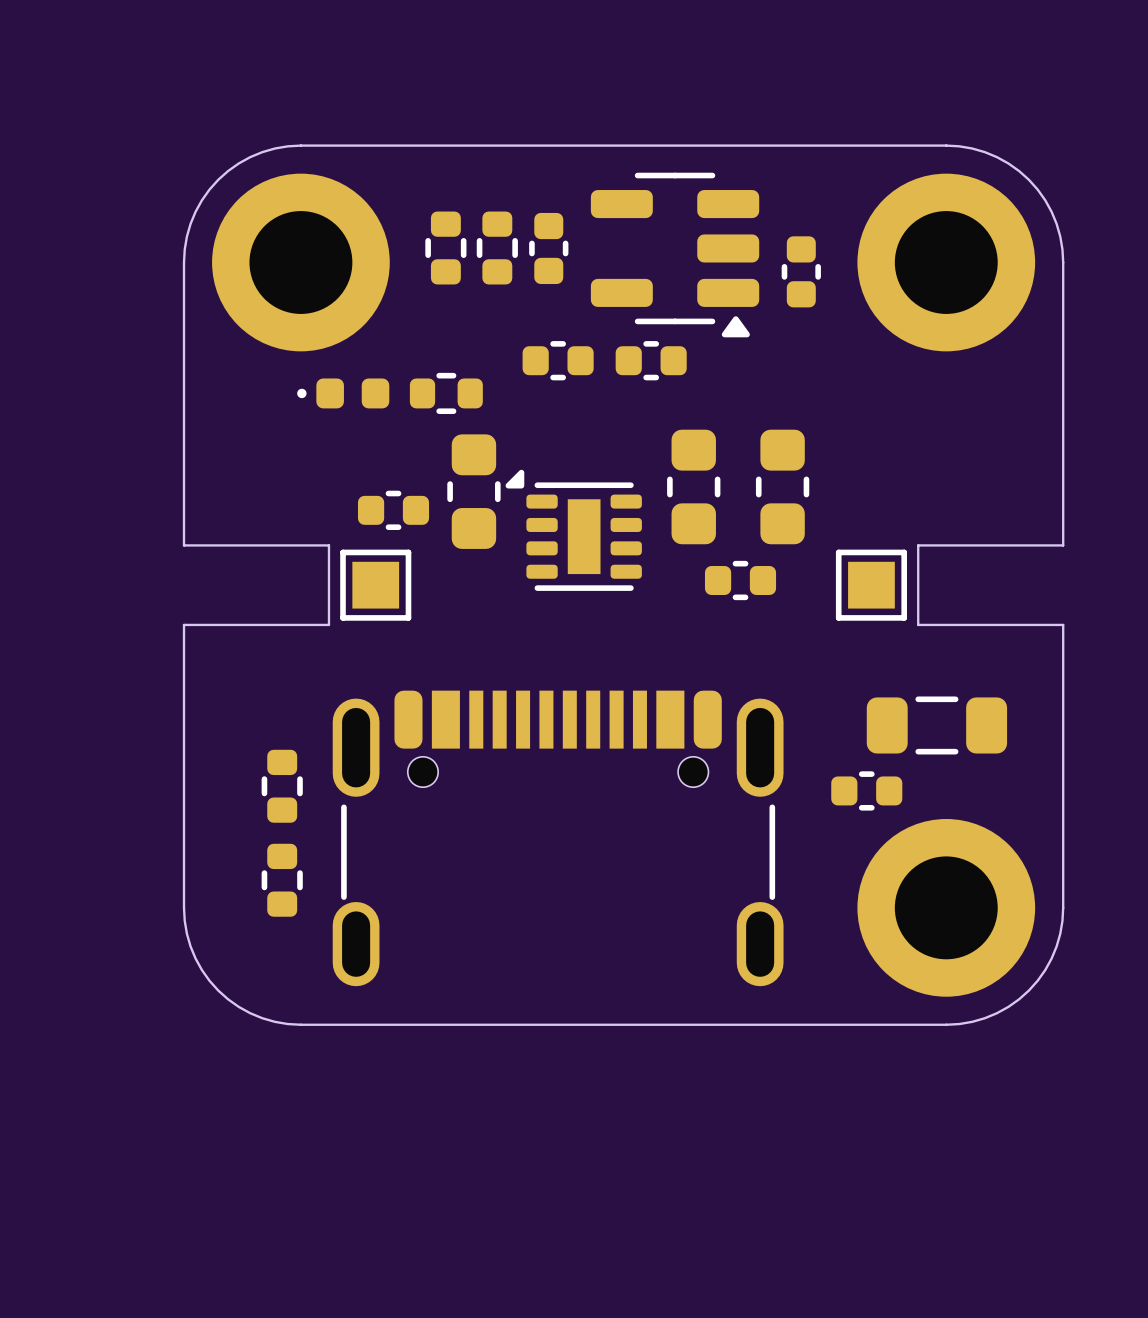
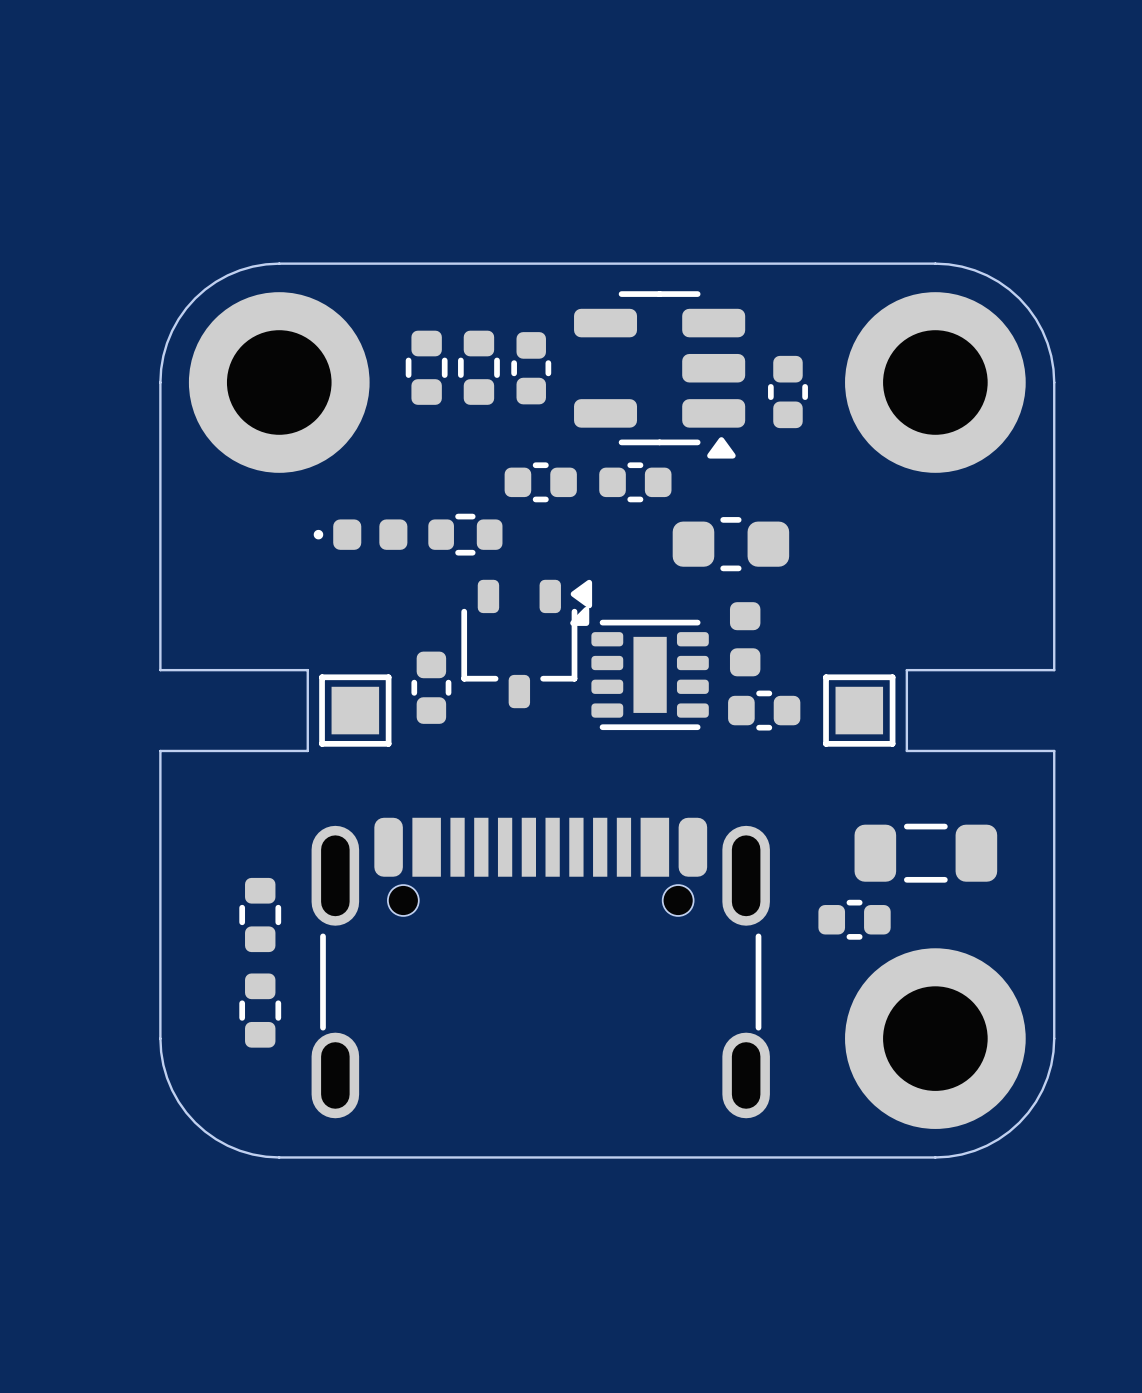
part position: (343, 393) -> (360, 534)
part position: (446, 393) -> (465, 534)
part: none -> (730, 544)
part footprint: [505, 469, 642, 591] -> [461, 579, 593, 709]
part: (693, 486) -> none
part: (782, 486) -> none
part: (473, 491) -> none
part rotation: 0° (393, 510) -> 90° clockwise (431, 687)
part position: (393, 510) -> (431, 687)
part: none -> (745, 639)
part: none -> (639, 668)
part position: (740, 580) -> (764, 710)

